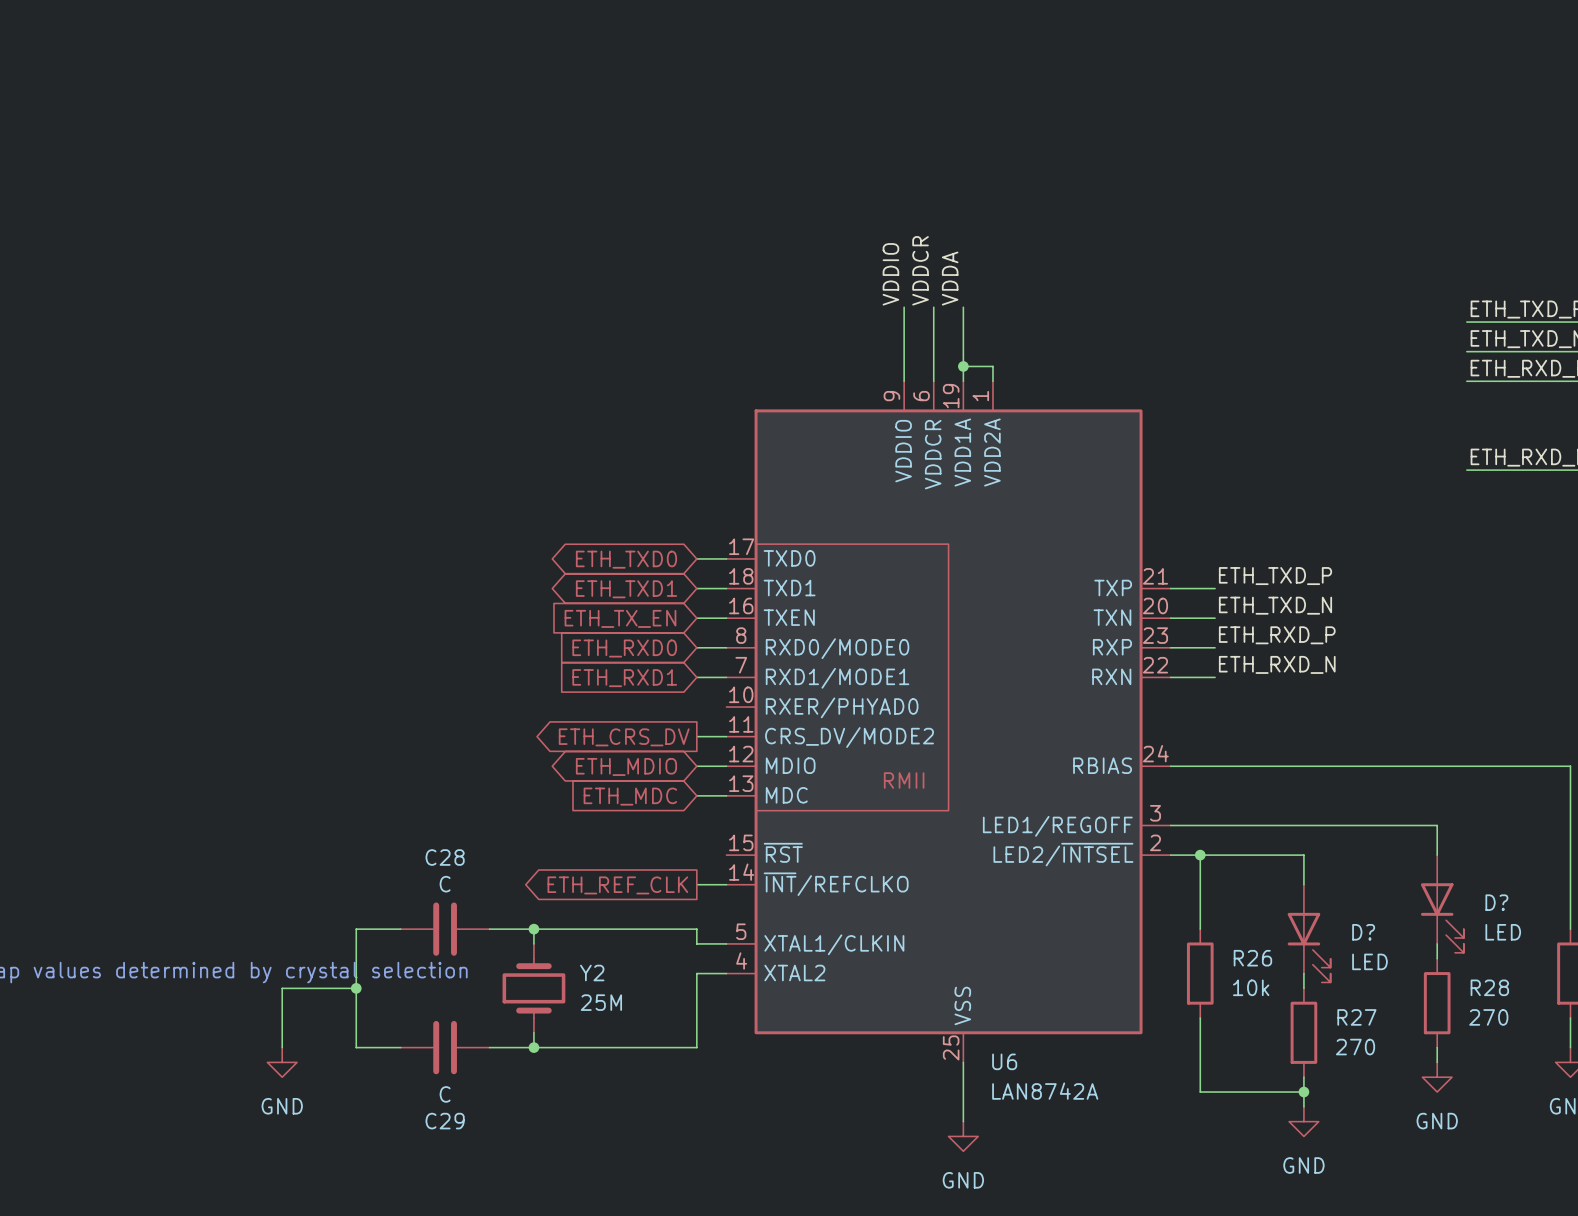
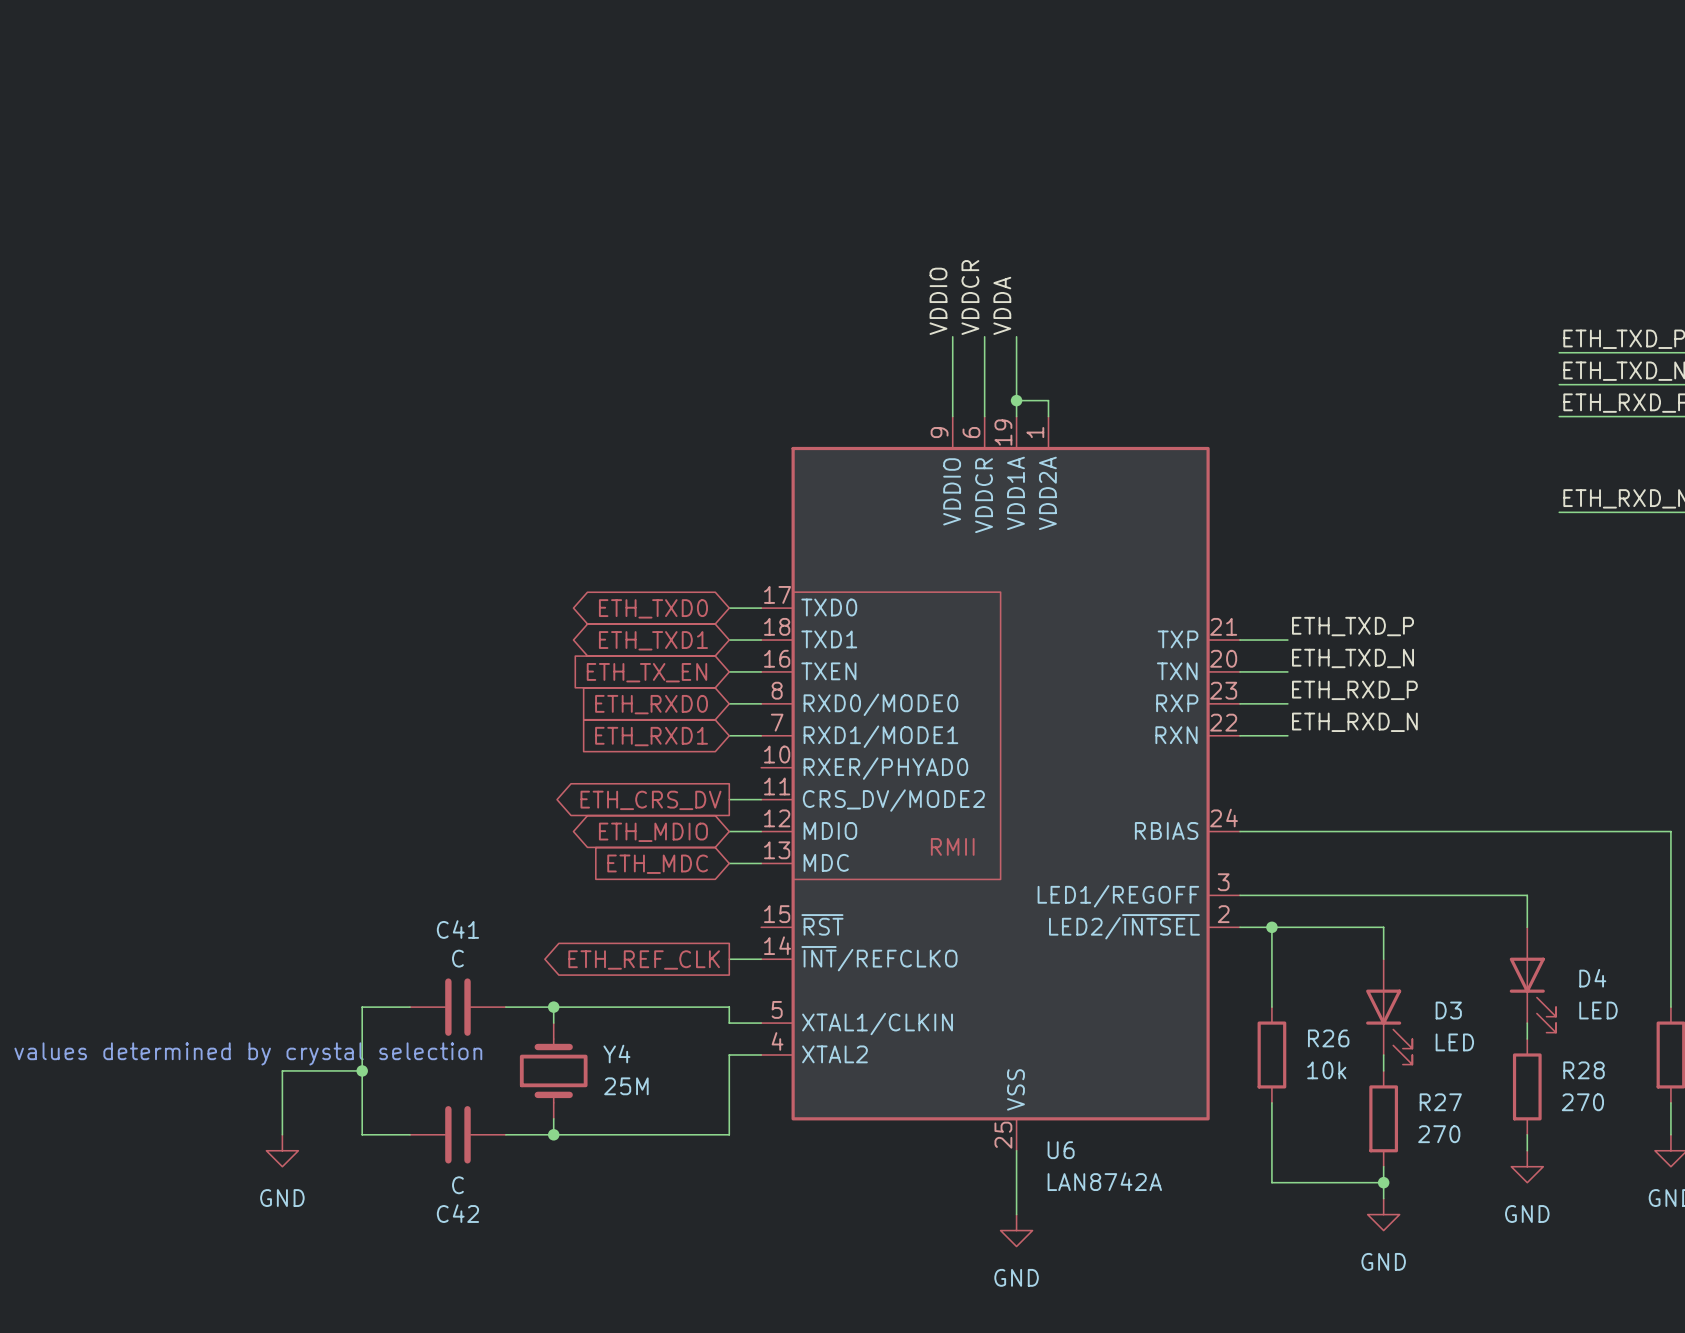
C28 name: C28 (445, 857) -> C41 (457, 929)
D? name: D? (1496, 902) -> D4 (1592, 978)
D? name: D? (1363, 932) -> D3 (1448, 1010)
Y2 name: Y2 (592, 973) -> Y4 (616, 1054)
C29 name: C29 (445, 1121) -> C42 (457, 1213)

